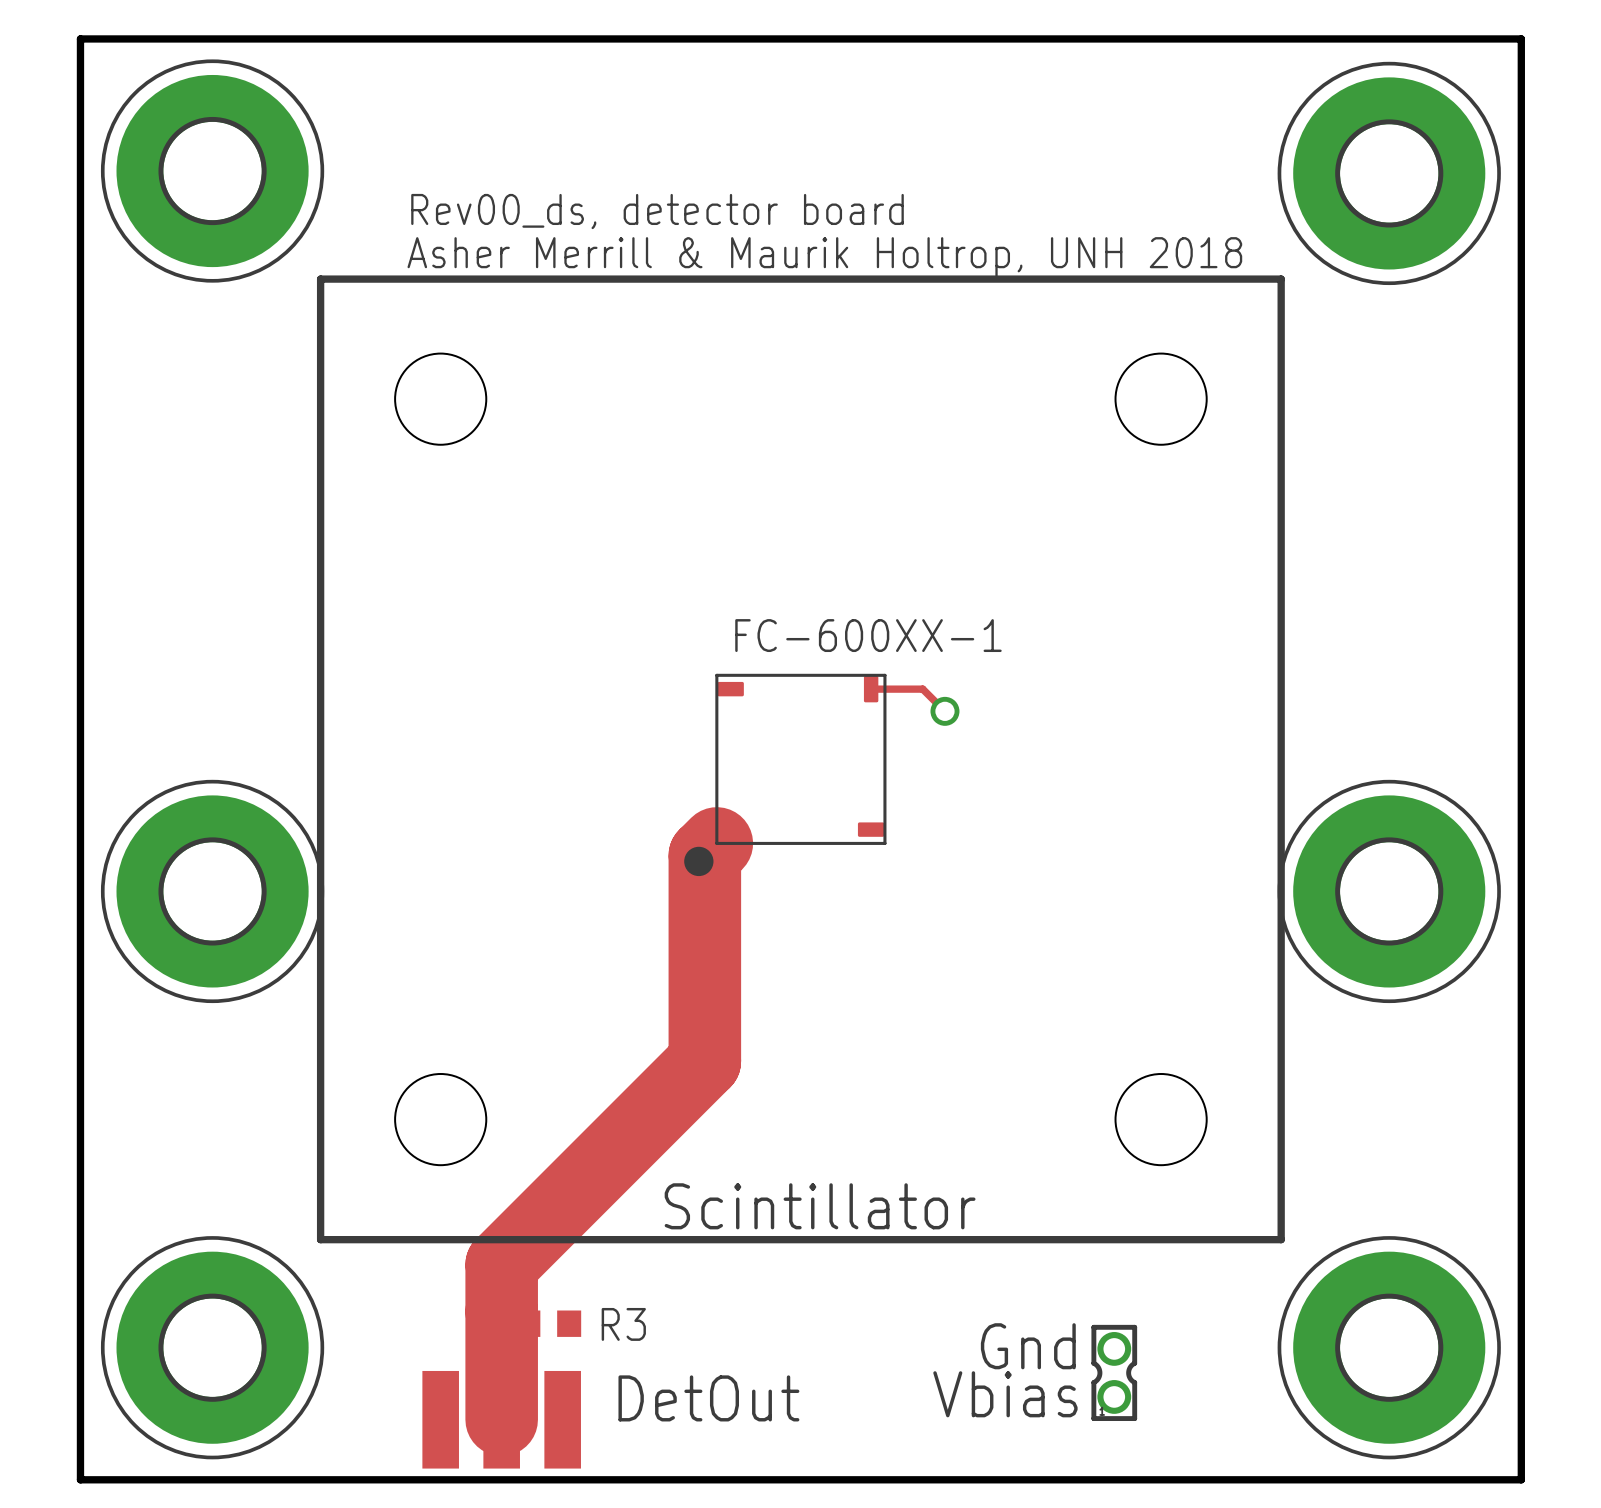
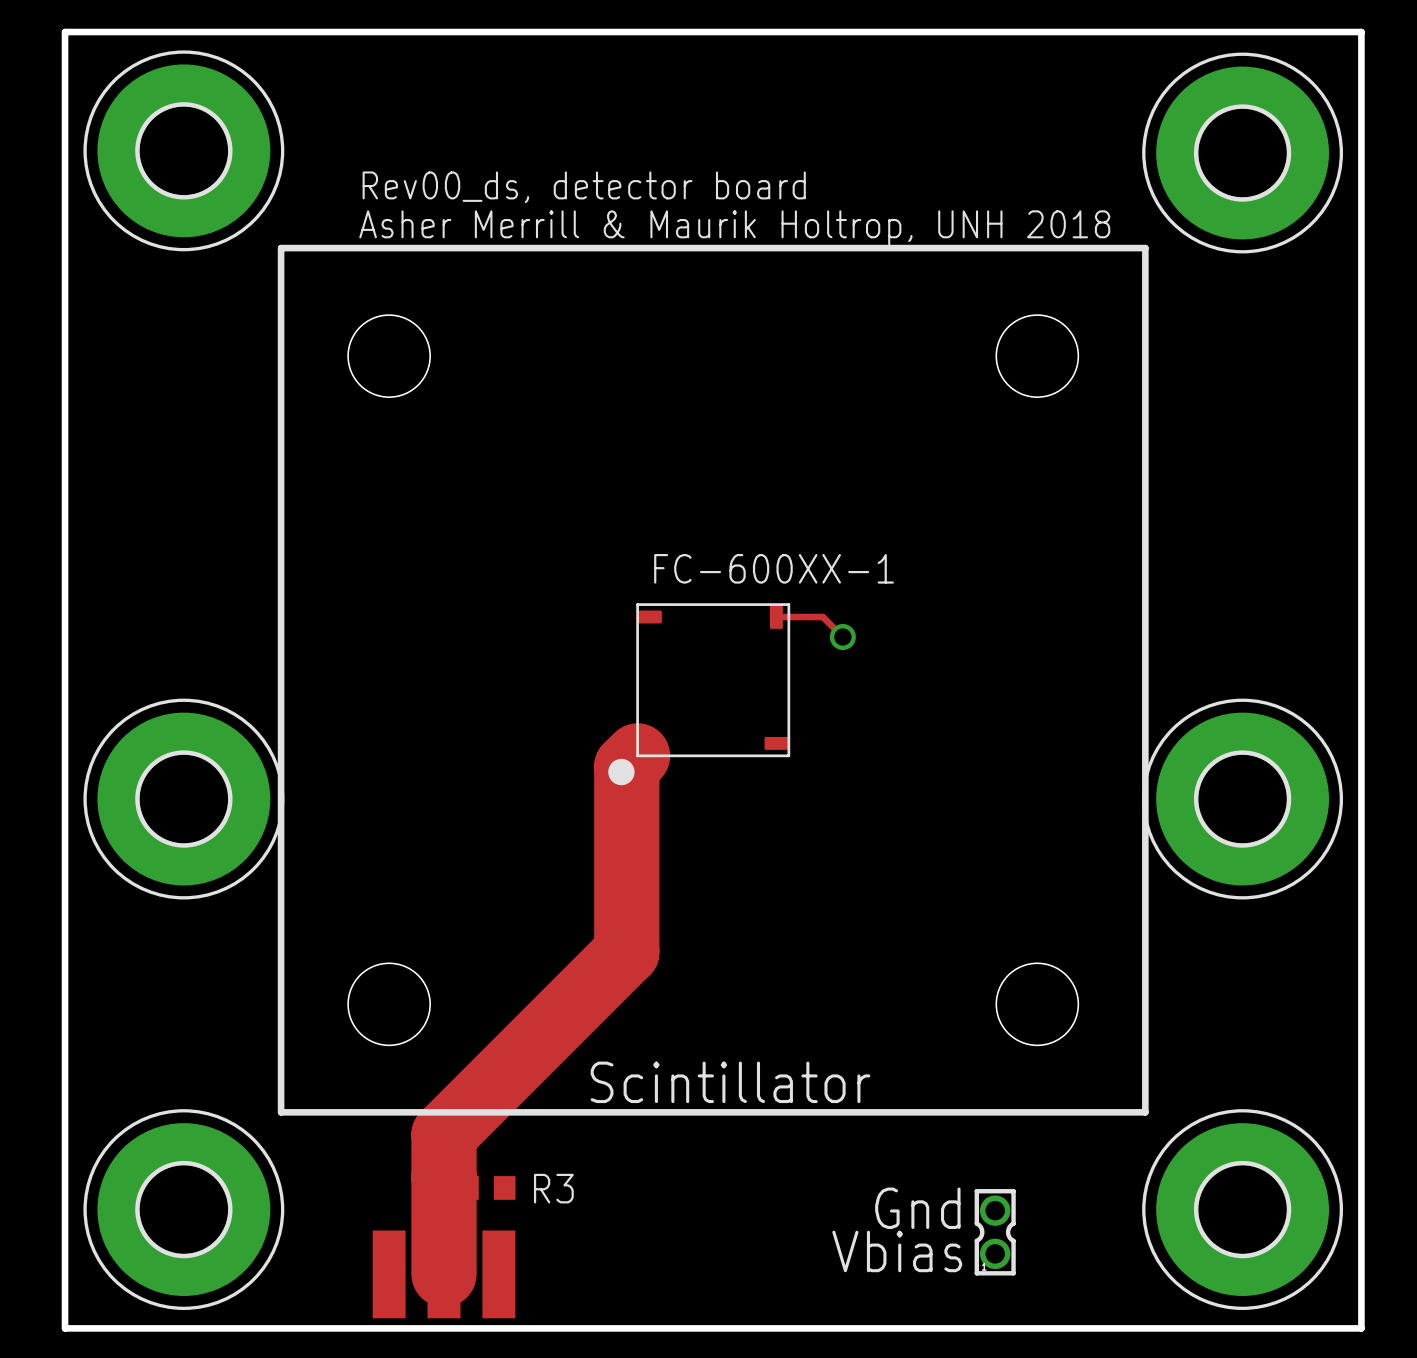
text: DetOut (708, 1398) -> none

